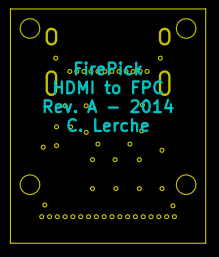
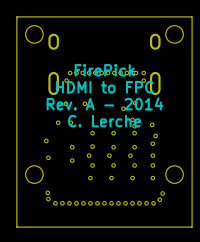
part position: (55, 58) -> (66, 80)
part: (160, 58) -> none
part: none -> (136, 72)
part: (147, 71) -> none
part: none -> (143, 72)
part: none -> (143, 80)
part: none -> (123, 108)
part: none -> (132, 119)
part: none -> (152, 124)
part: (86, 132) -> none
part: none -> (92, 133)
part: none -> (113, 133)
part: none -> (134, 133)
part: none -> (155, 136)
part: (97, 144) -> none
part: (129, 144) -> none
part: (56, 145) -> none
part: none -> (92, 146)
part: none -> (72, 147)
part: none -> (113, 147)
part: none -> (134, 147)
part: (92, 159) -> none
part: (115, 159) -> none
part: (139, 159) -> none
part: none -> (89, 155)
part: none -> (109, 155)
part: none -> (130, 155)
part: none -> (152, 155)
part: none -> (48, 157)
part: none -> (72, 160)
part: none -> (92, 165)
part: none -> (113, 165)
part: none -> (134, 165)
part: none -> (152, 165)
part: none -> (48, 199)
part: none -> (159, 199)
part: (41, 216) -> none
part: (49, 216) -> none
part: none -> (55, 203)
part: (57, 216) -> none
part: none -> (62, 203)
part: (65, 216) -> none
part: none -> (69, 203)
part: (72, 216) -> none
part: none -> (76, 203)
part: (80, 216) -> none
part: none -> (83, 203)
part: (88, 216) -> none
part: none -> (90, 203)
part: (96, 216) -> none
part: none -> (97, 203)
part: (104, 216) -> none
part: none -> (104, 203)
part: (111, 216) -> none
part: none -> (111, 203)
part: (119, 216) -> none
part: none -> (118, 203)
part: (127, 216) -> none
part: none -> (125, 203)
part: (135, 216) -> none
part: none -> (132, 203)
part: (143, 216) -> none
part: none -> (139, 203)
part: (151, 216) -> none
part: none -> (146, 203)
part: (158, 216) -> none
part: none -> (153, 203)
part: (166, 216) -> none
part: (174, 216) -> none

